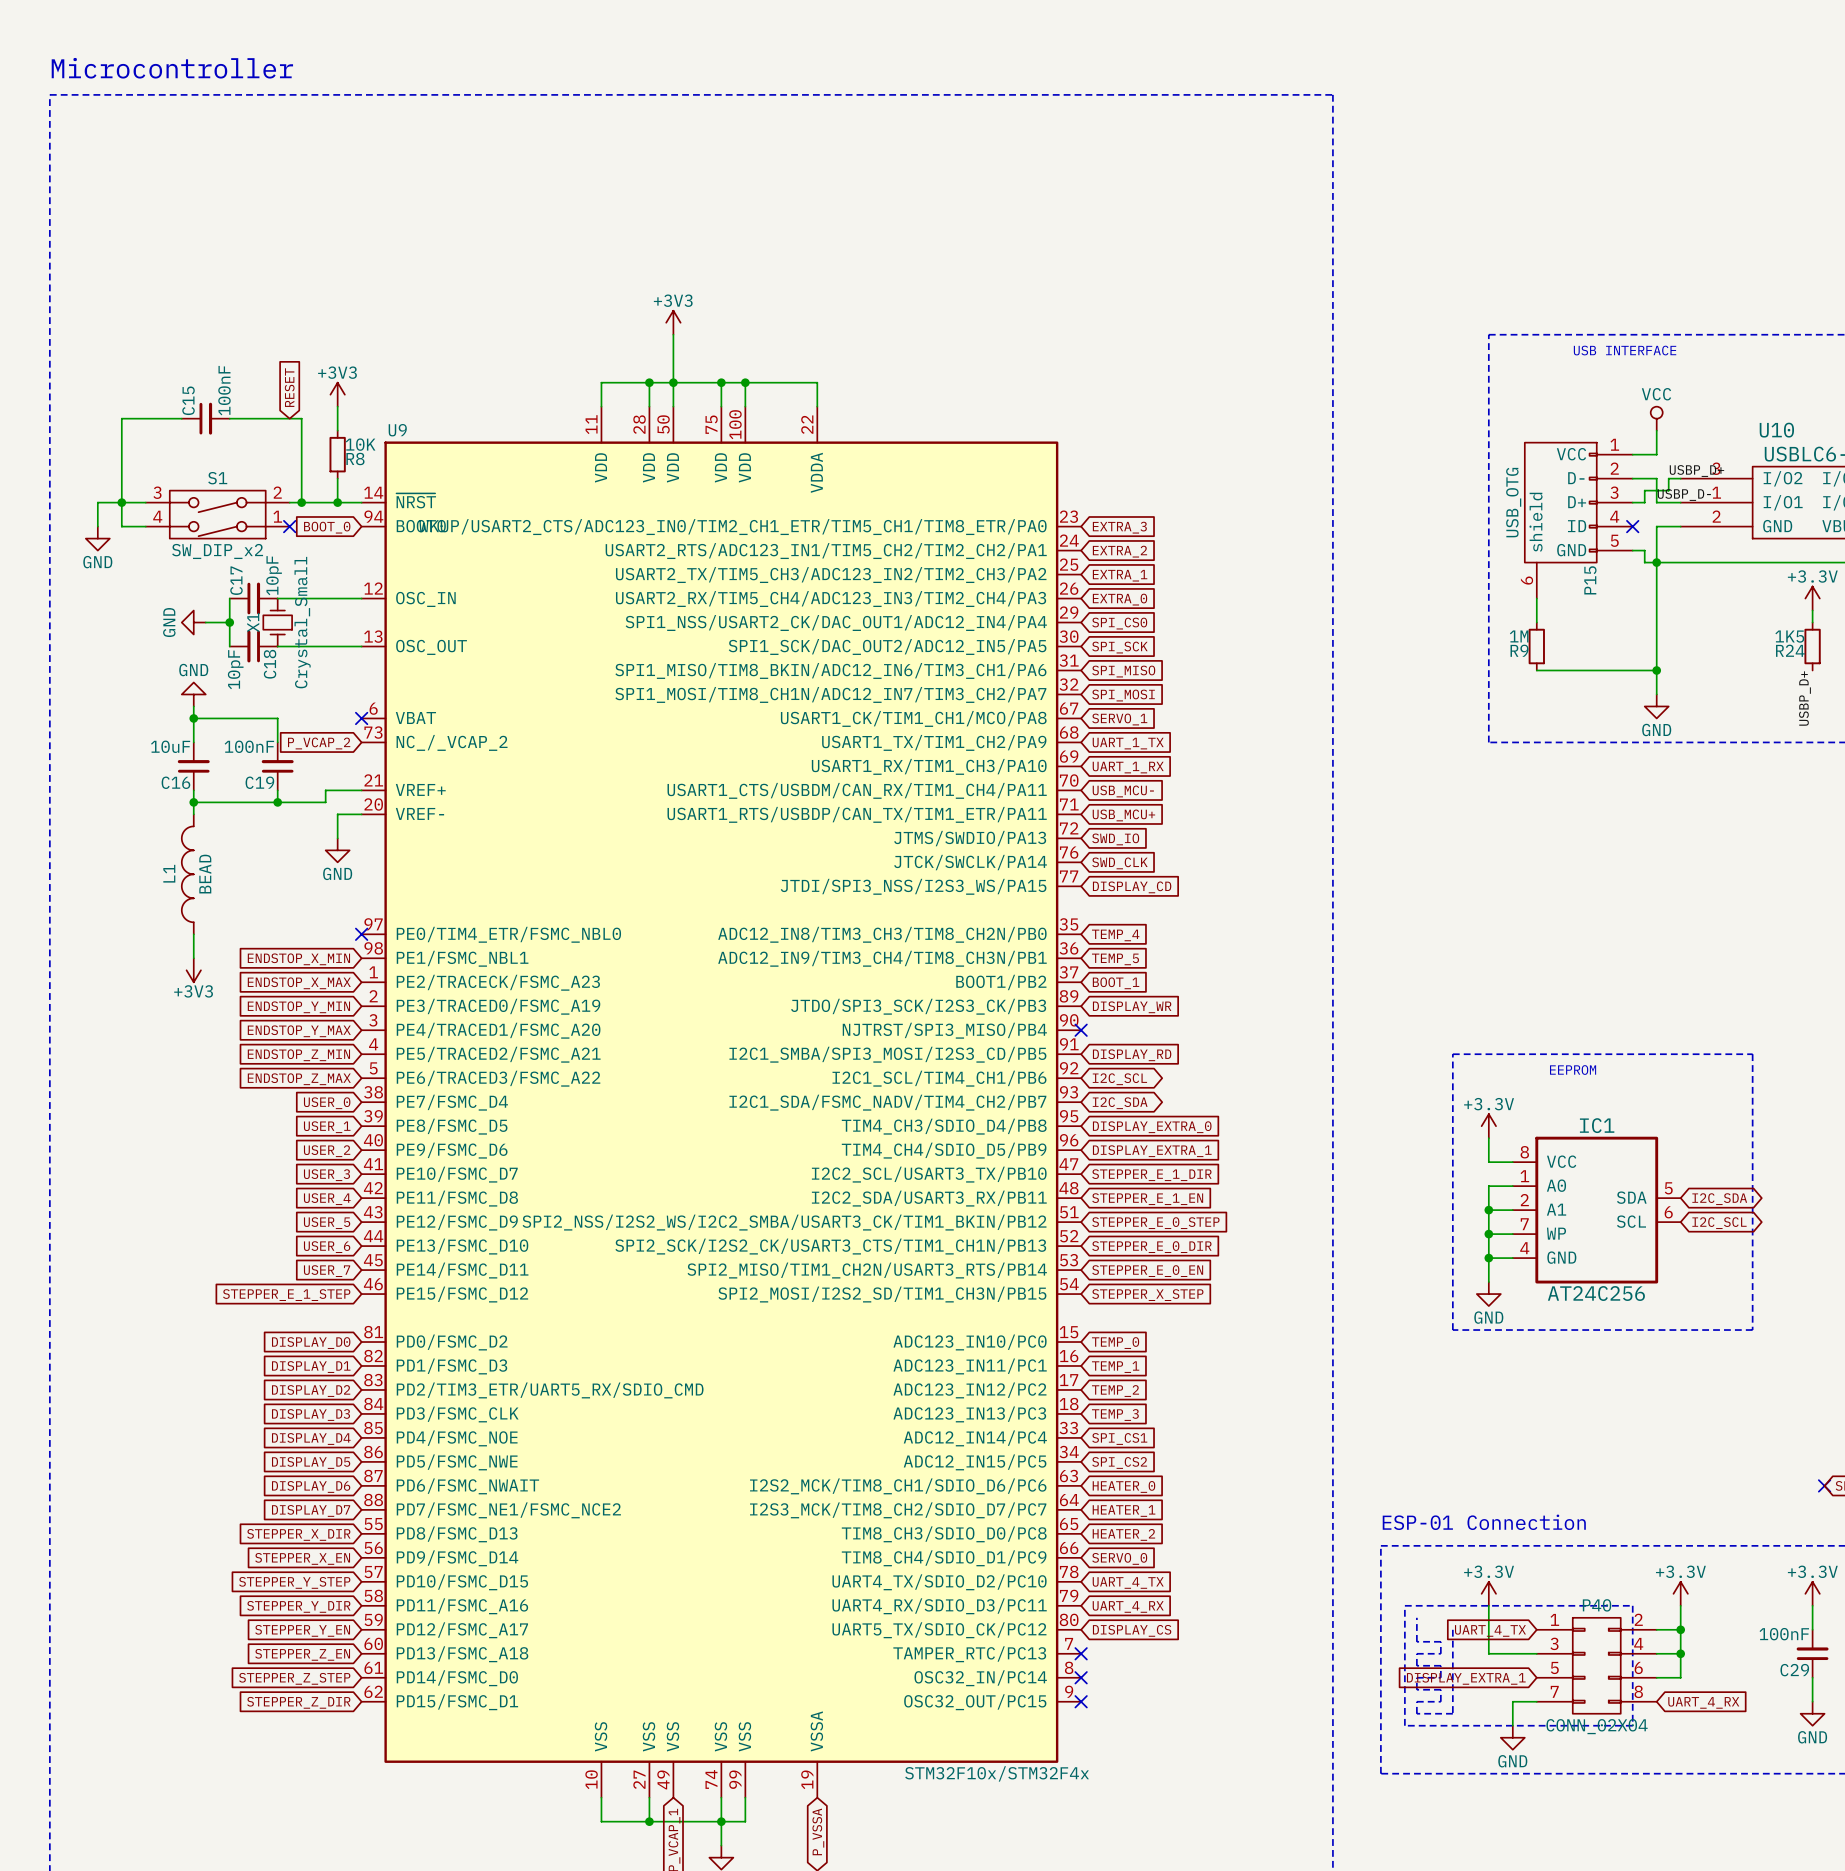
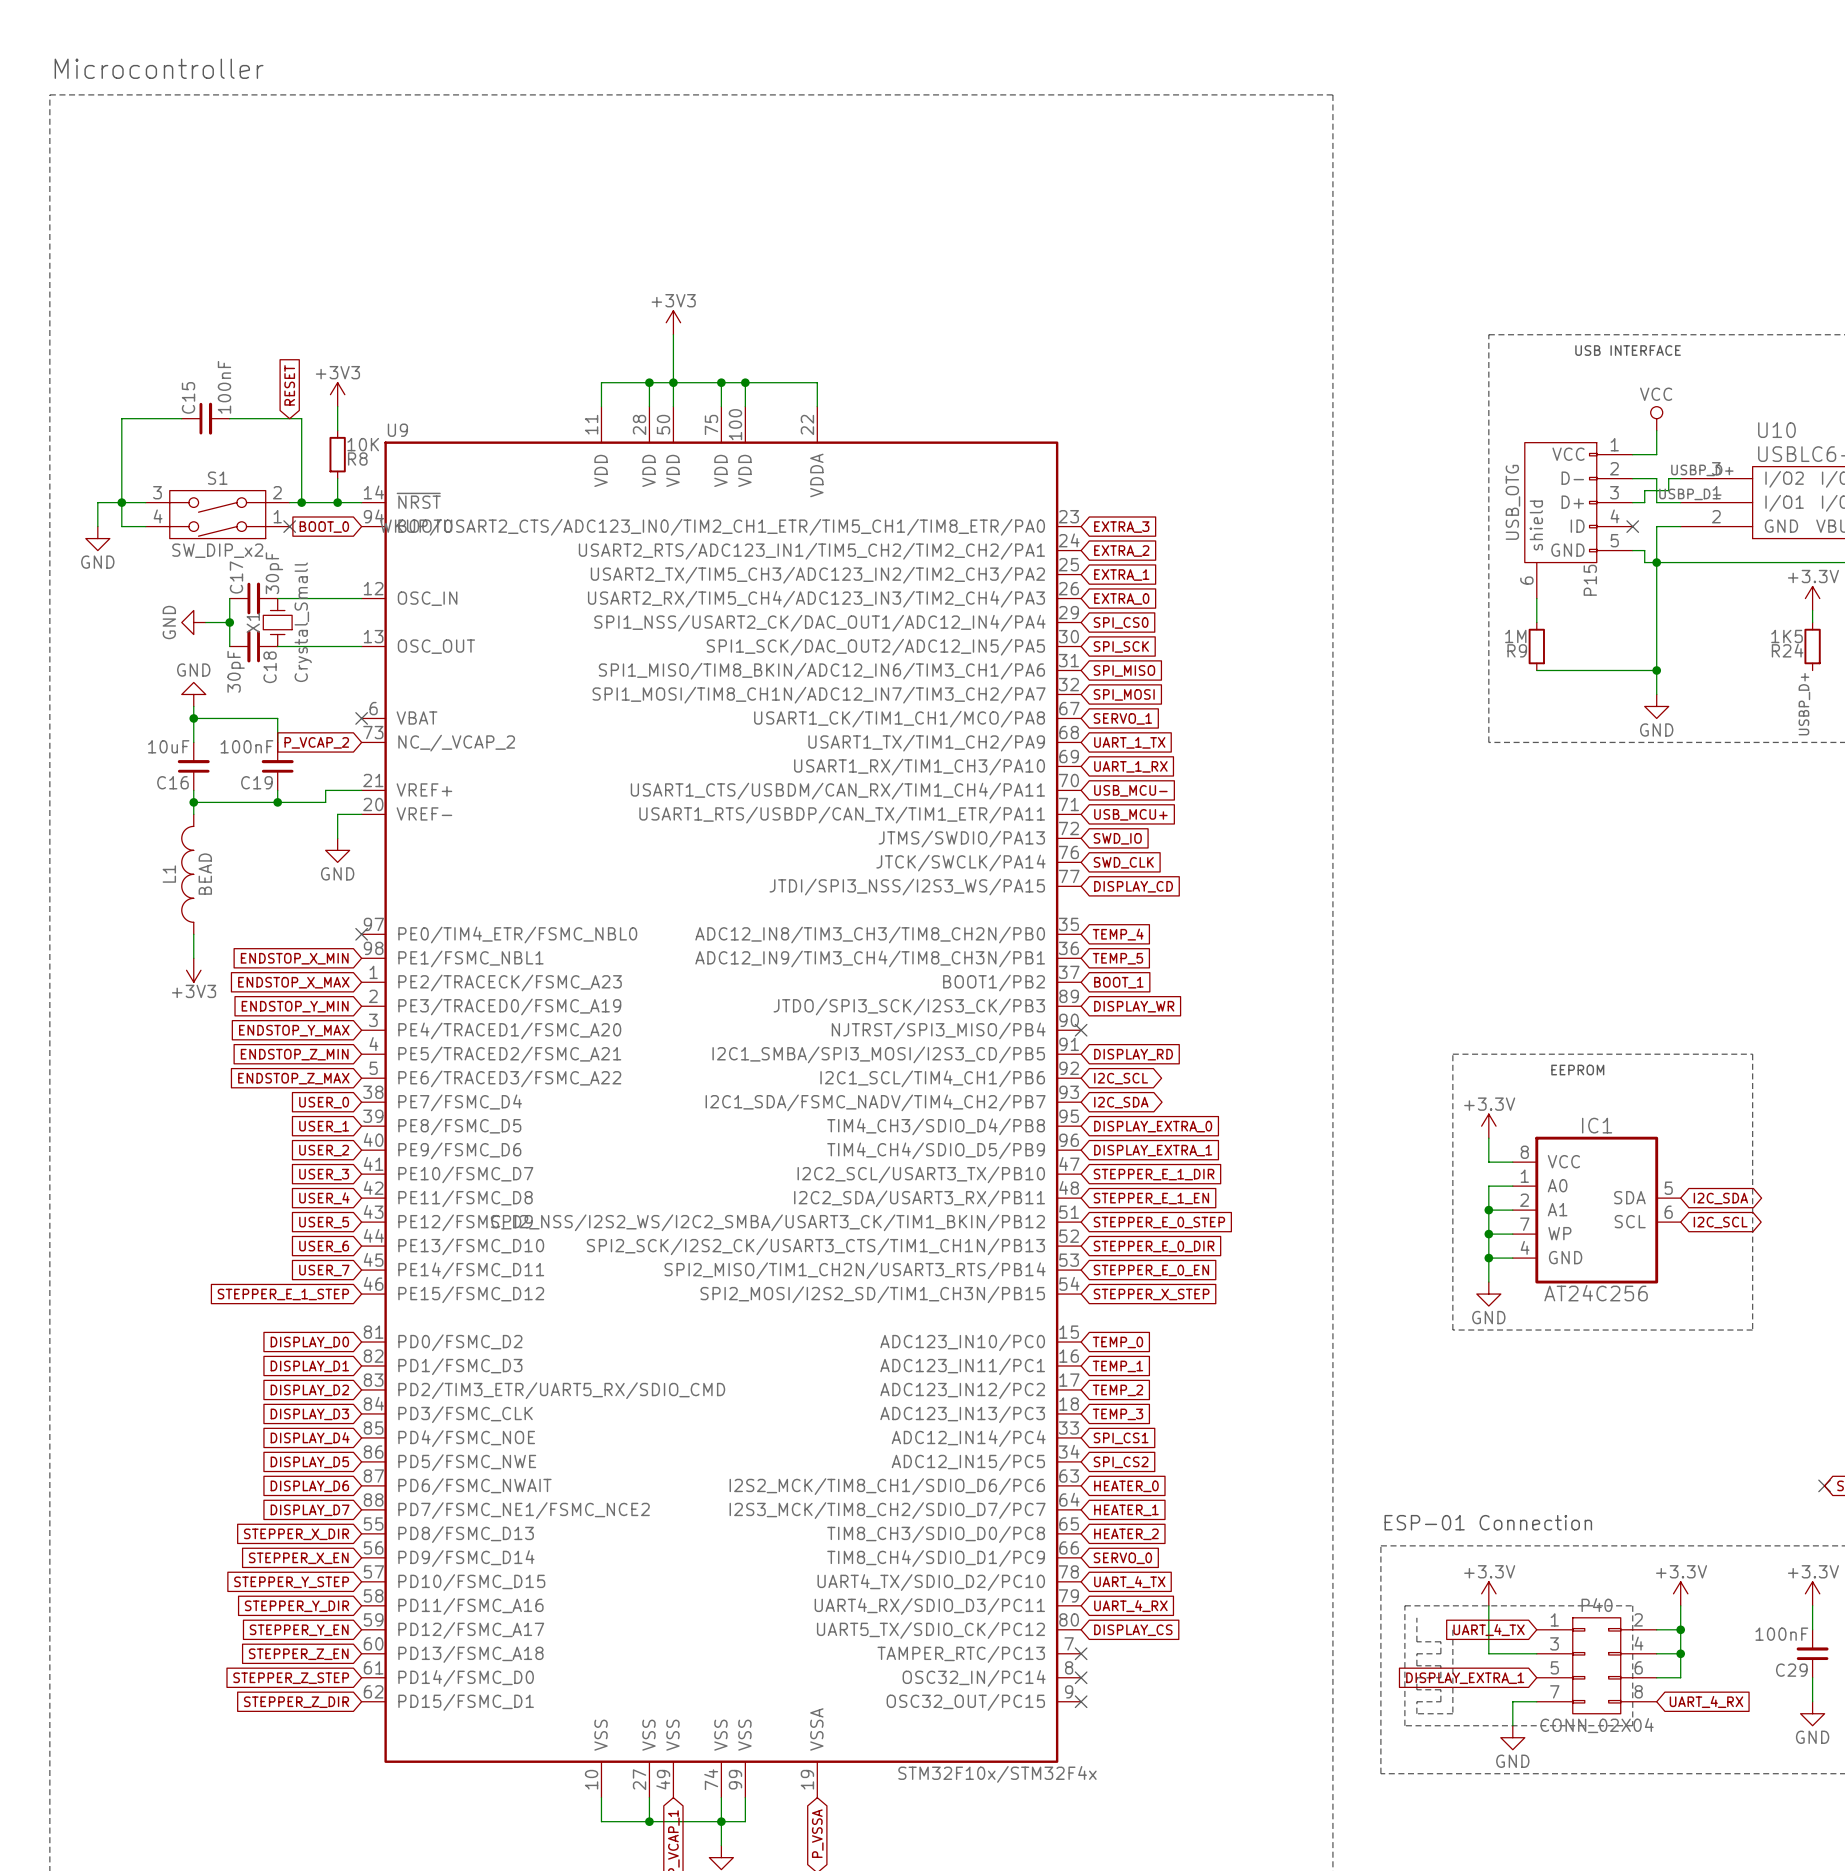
C17 value: 10pF (274, 575) -> 30pF (274, 573)
C18 value: 10pF (235, 669) -> 30pF (236, 671)

